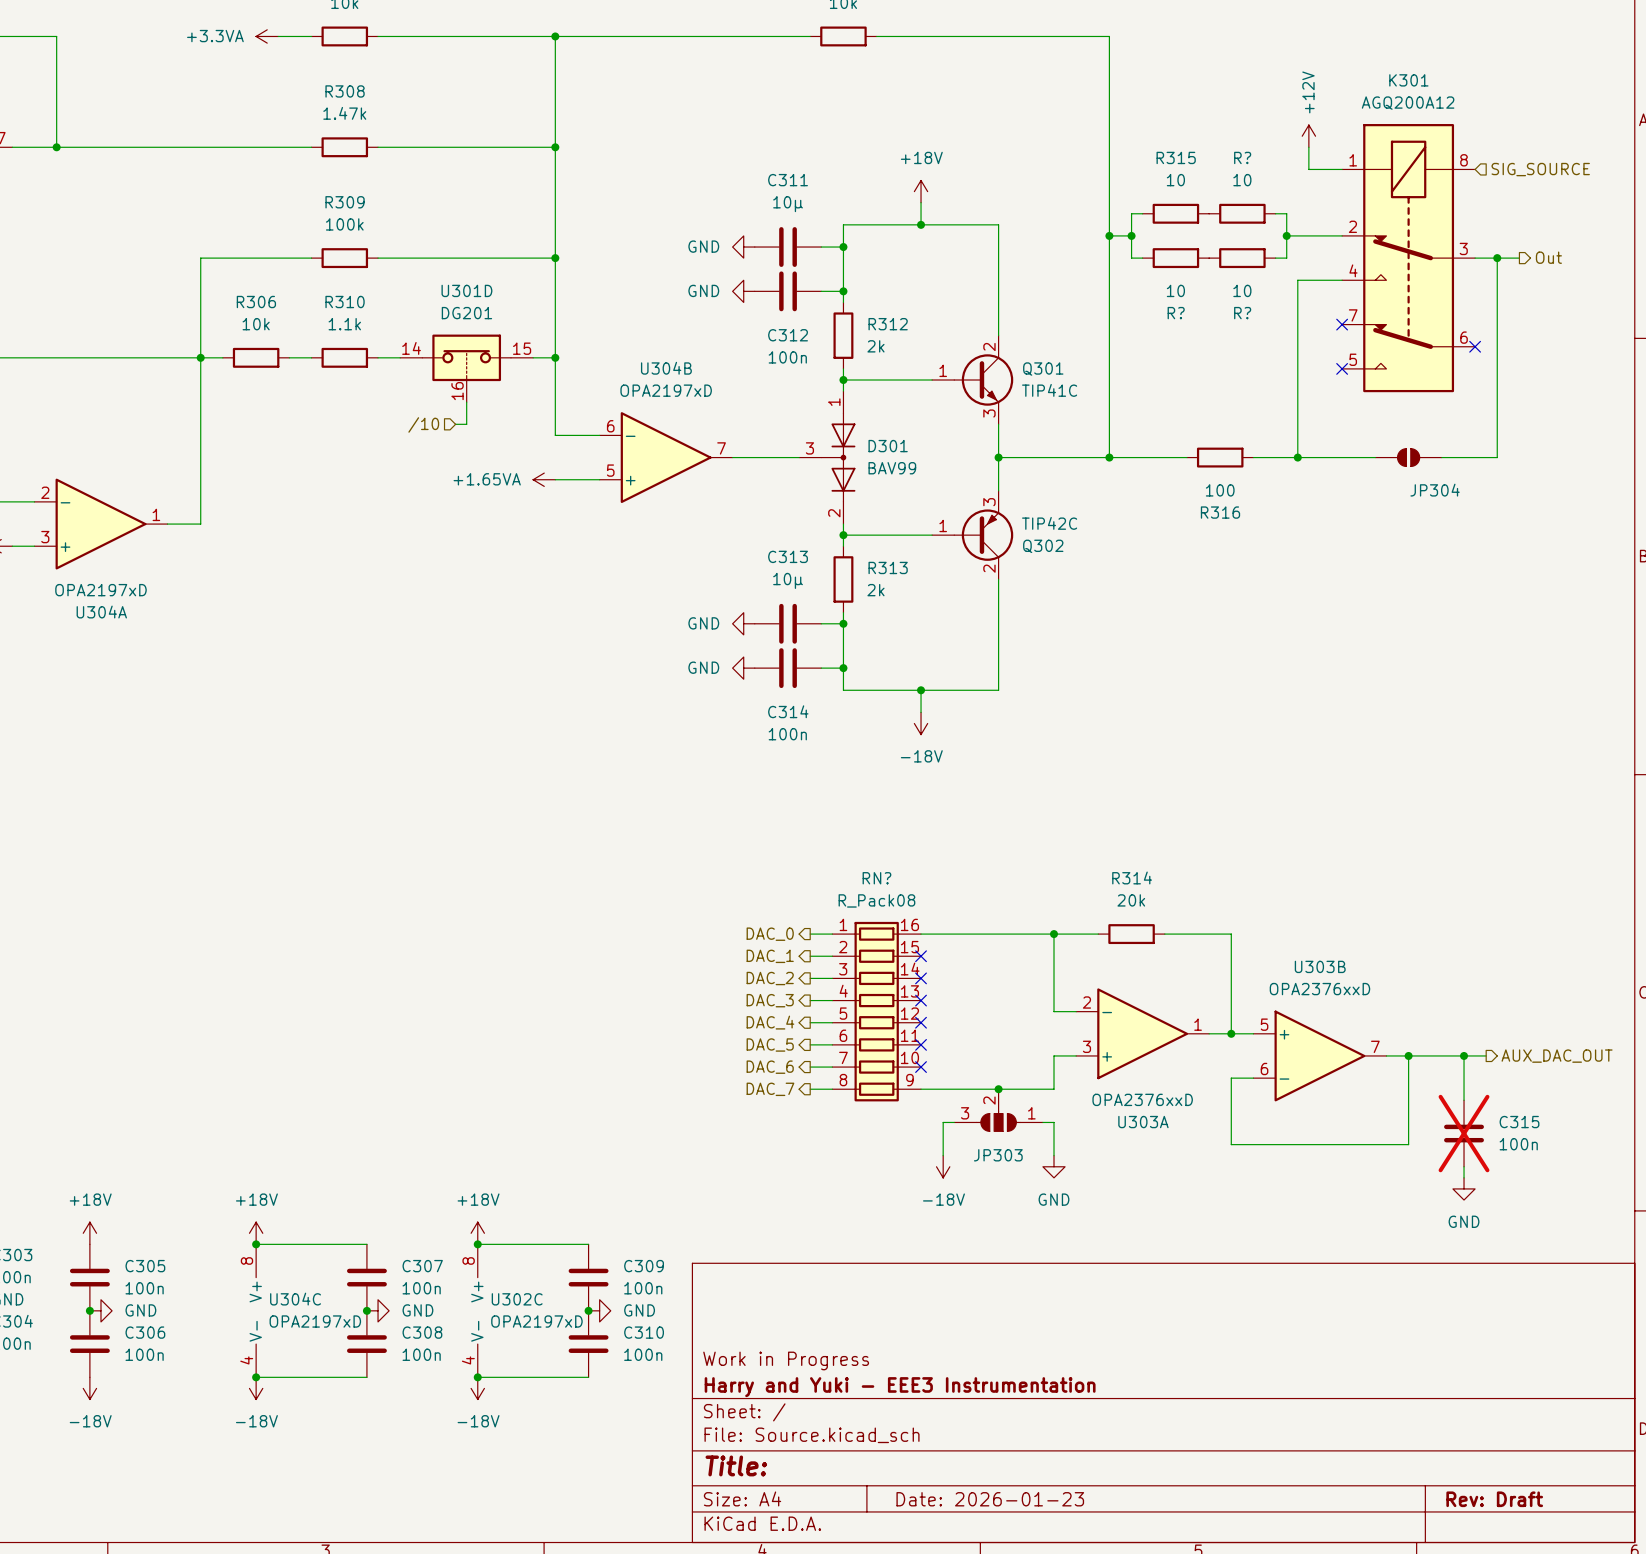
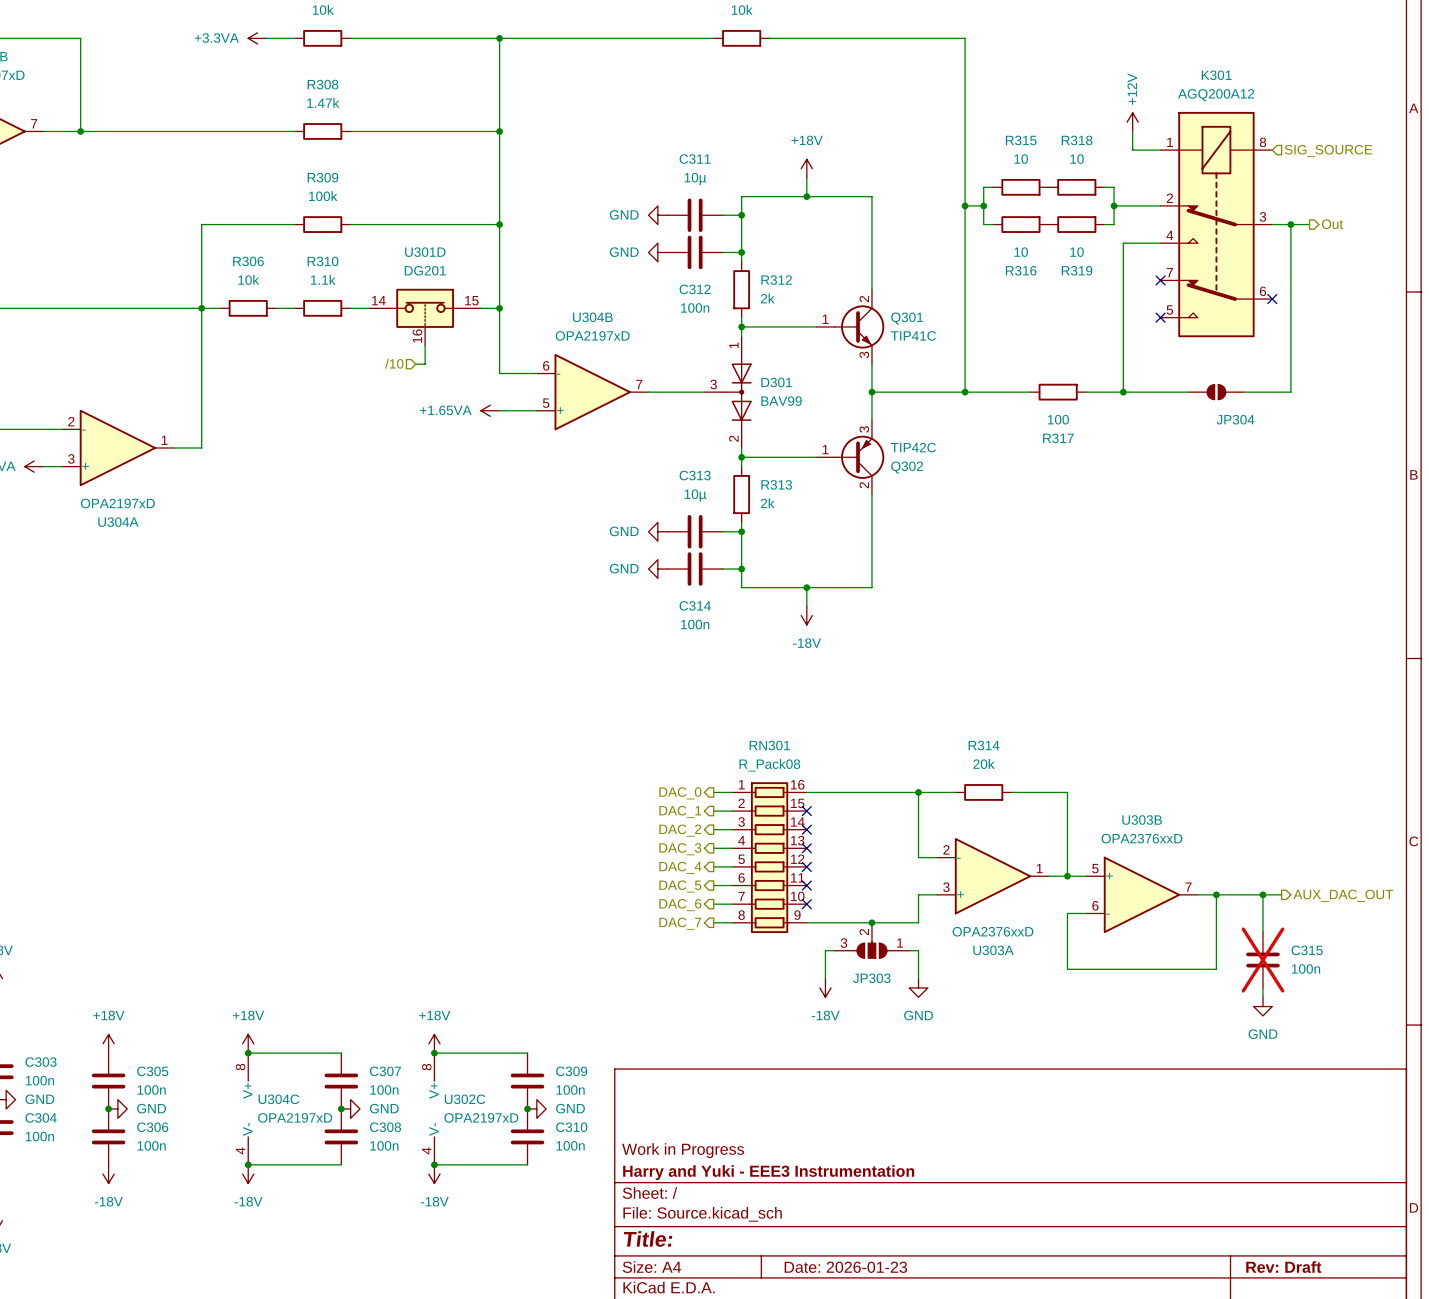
R? name: R? (1242, 157) -> R318 (1077, 140)
R? name: R? (1176, 313) -> R316 (1021, 270)
R? name: R? (1242, 313) -> R319 (1077, 270)
R316 name: R316 (1220, 512) -> R317 (1058, 438)
RN? name: RN? (876, 878) -> RN301 (769, 745)

